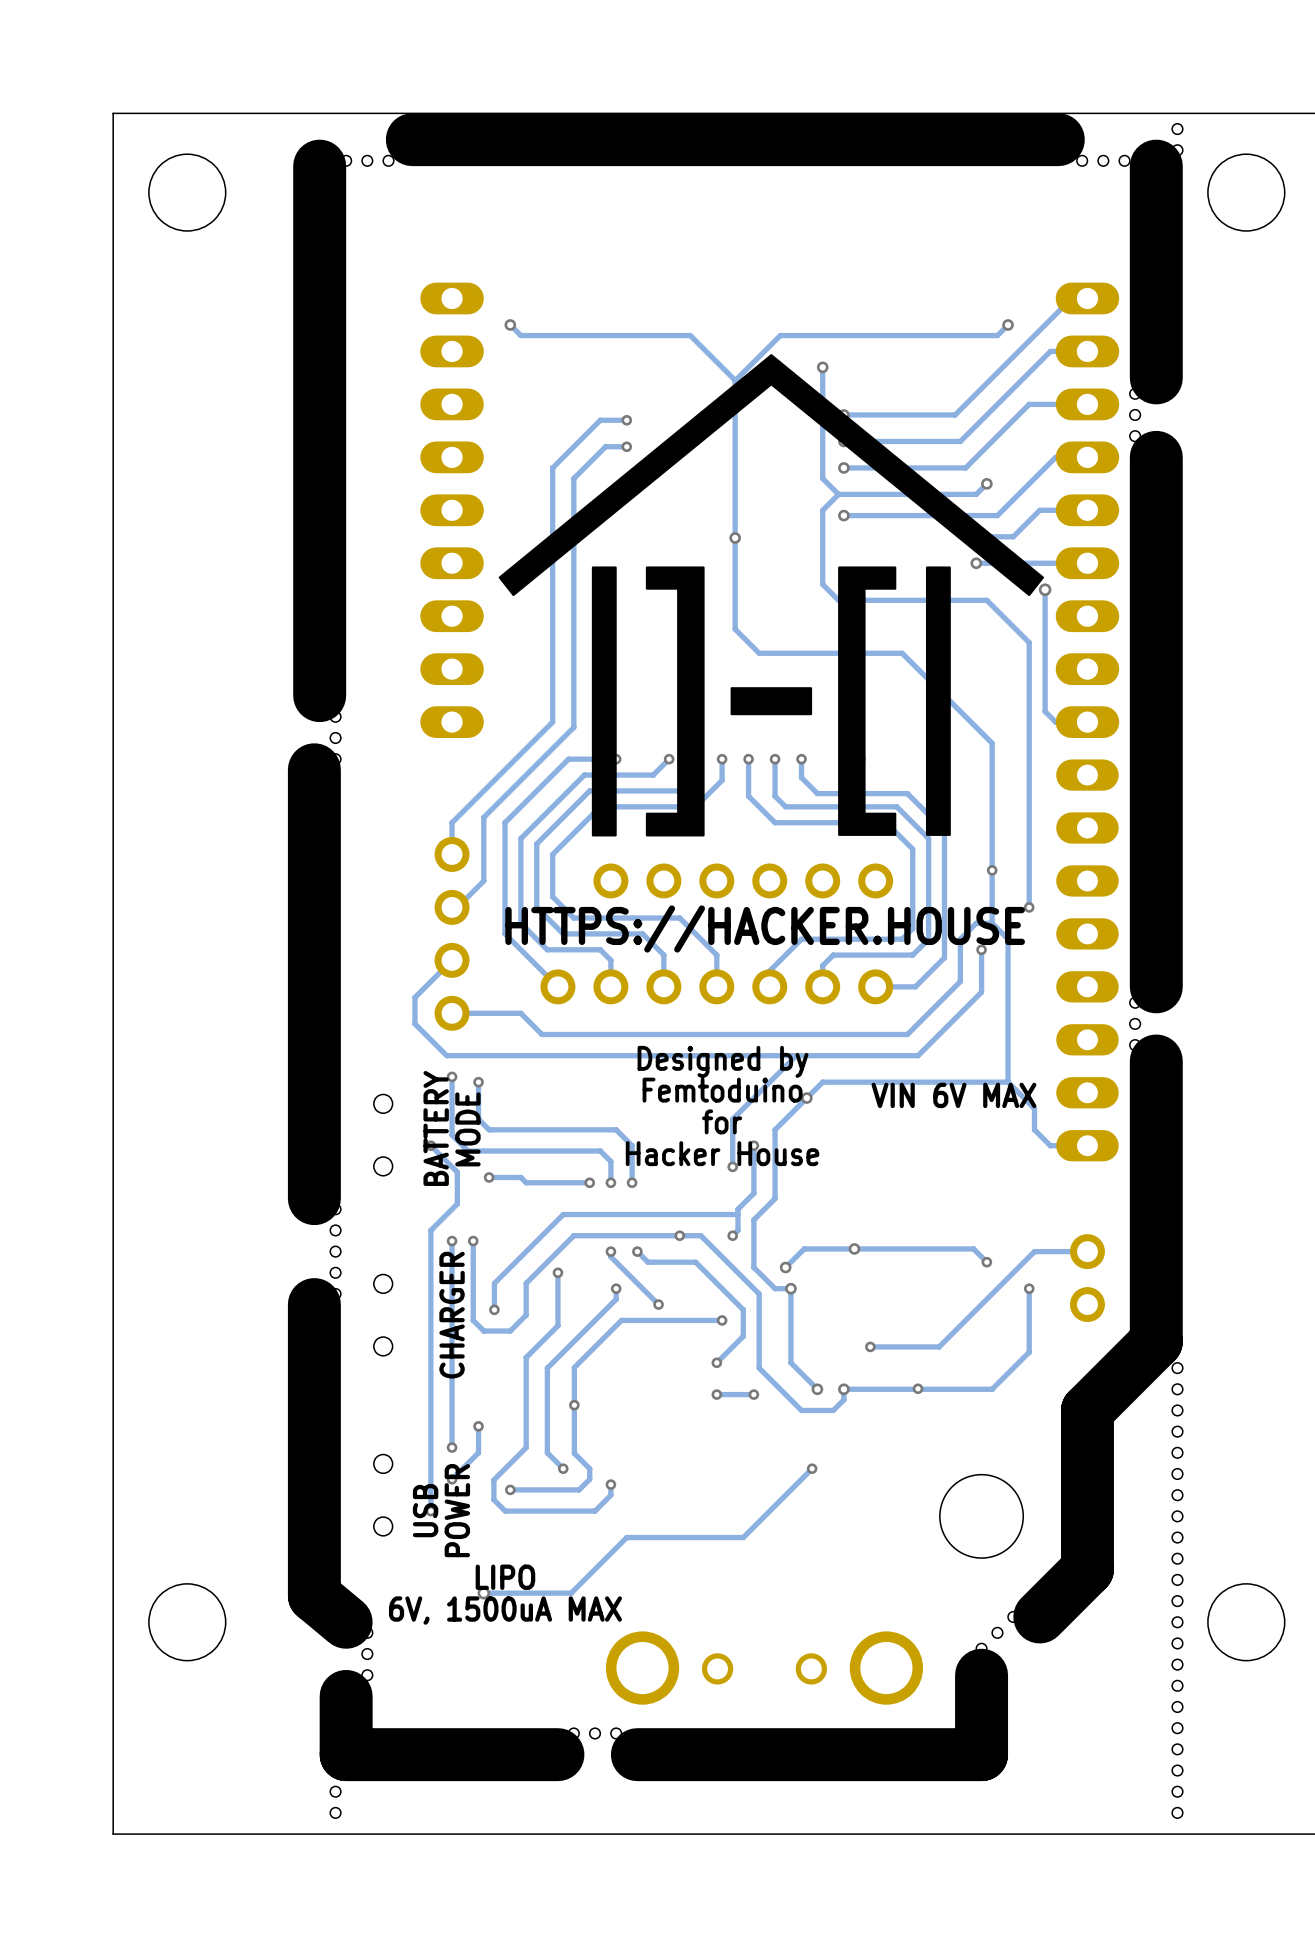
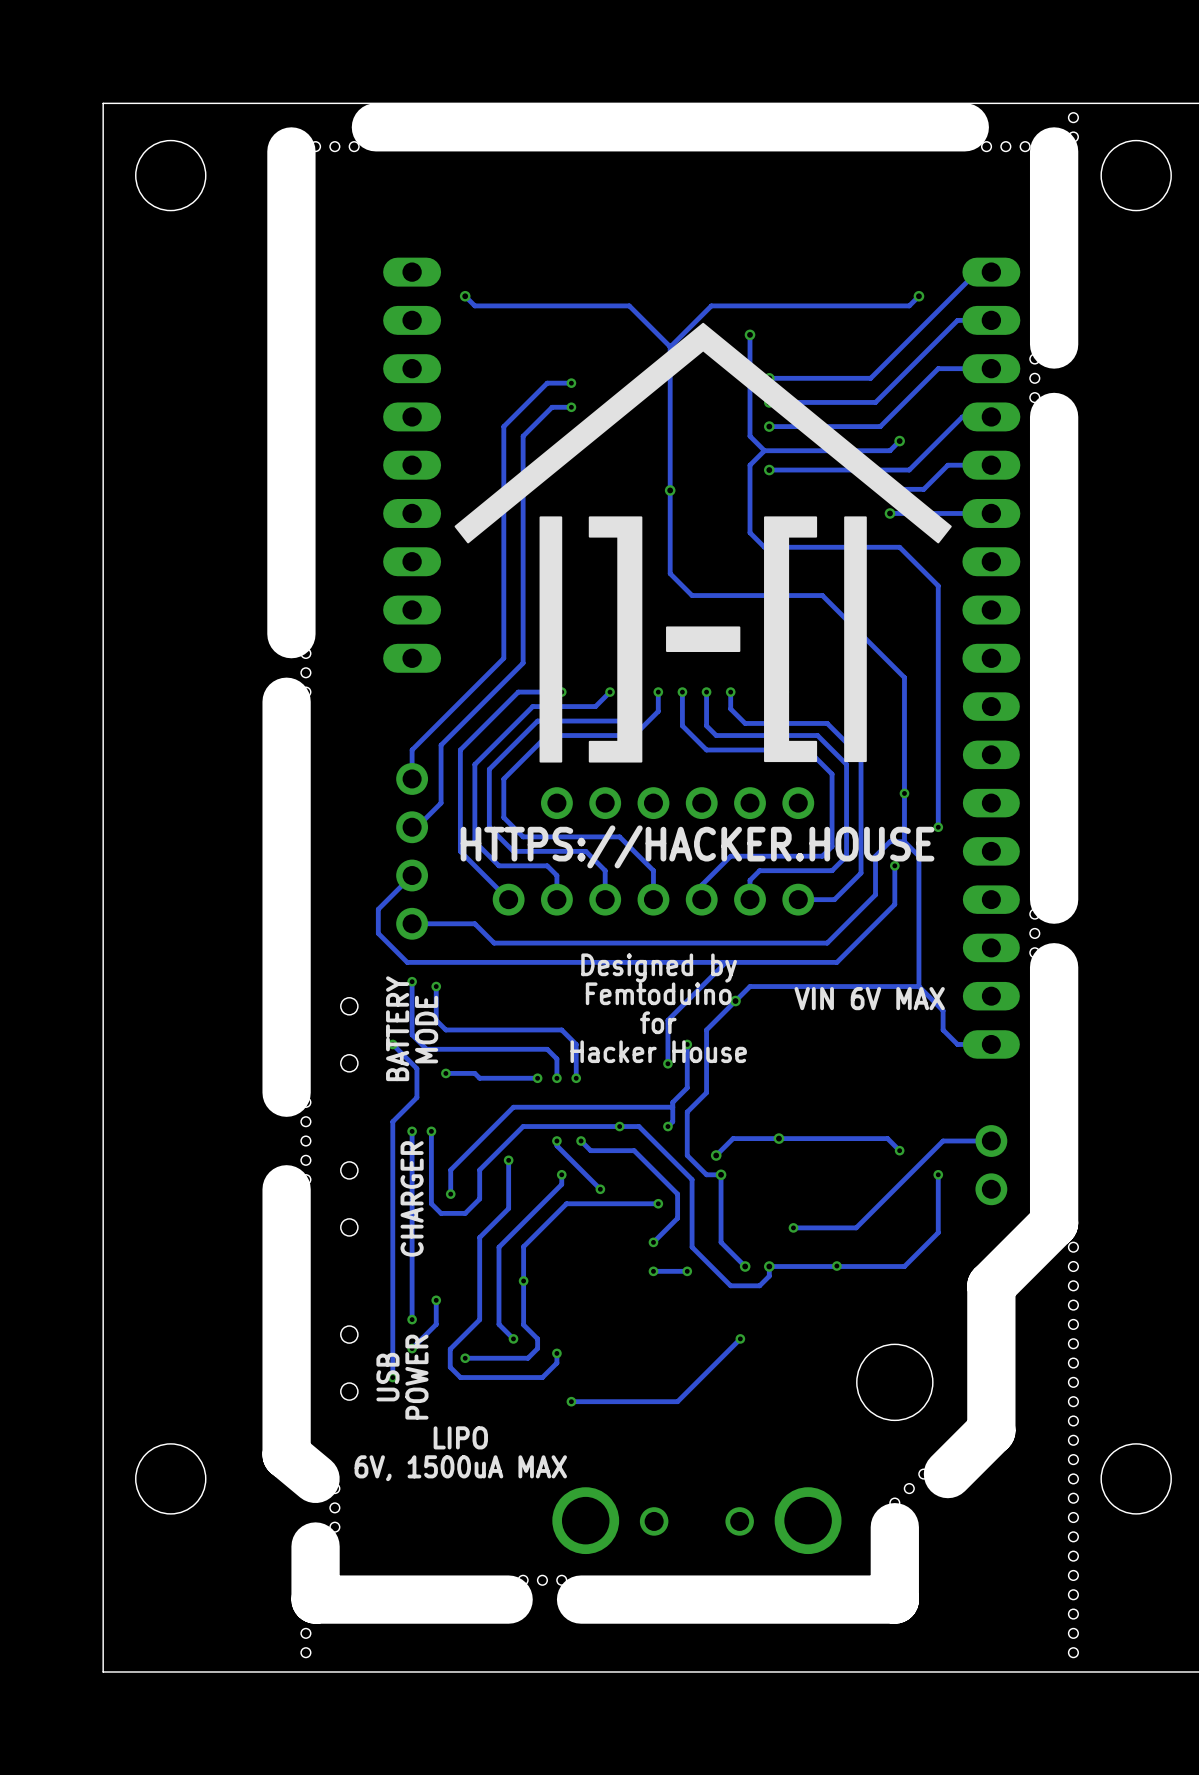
track: (1045, 589) (1045, 711) (1055, 722) (1087, 722) -> none
via: (1045, 589) -> none
track: (626, 1537) (571, 1593) (483, 1593) -> none
via: none -> (571, 1401)
via: (483, 1593) -> none

